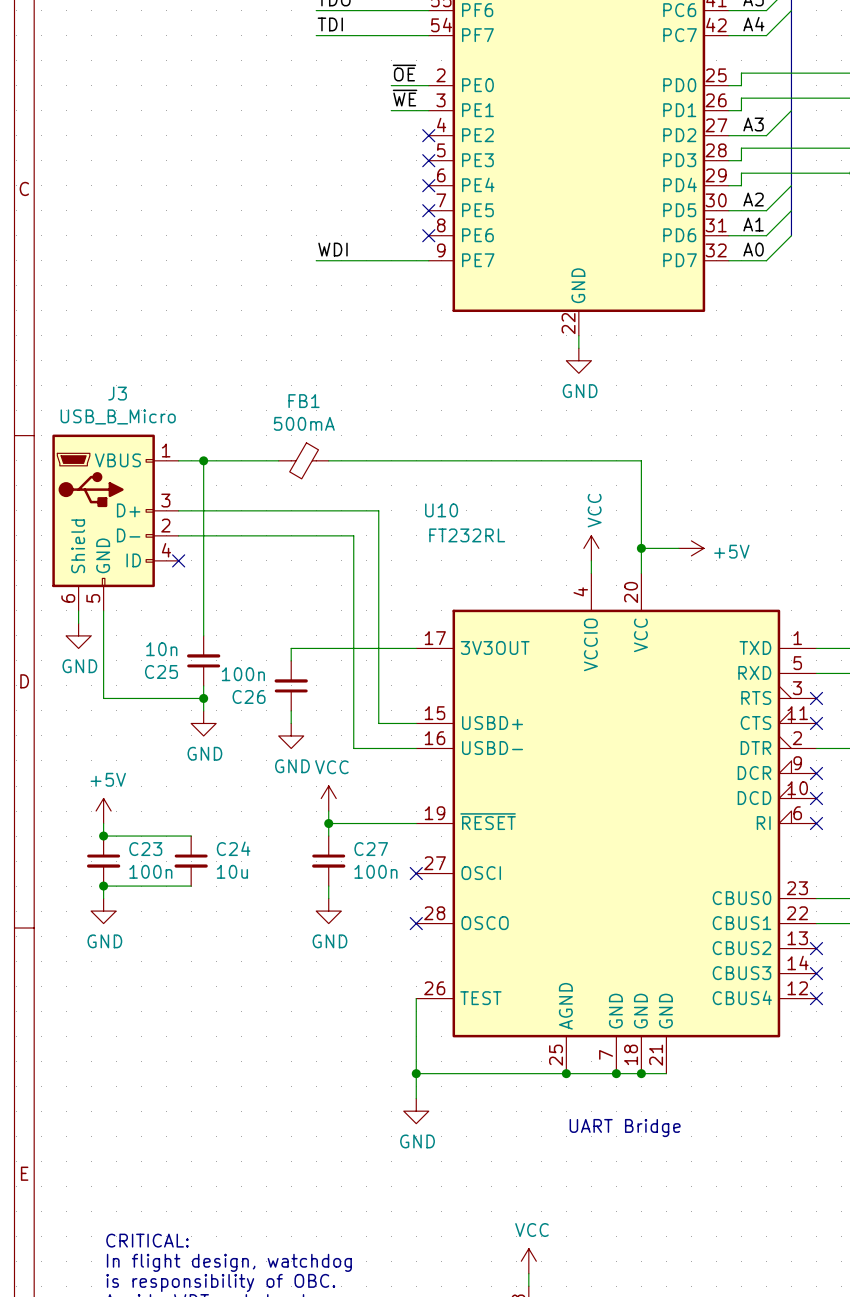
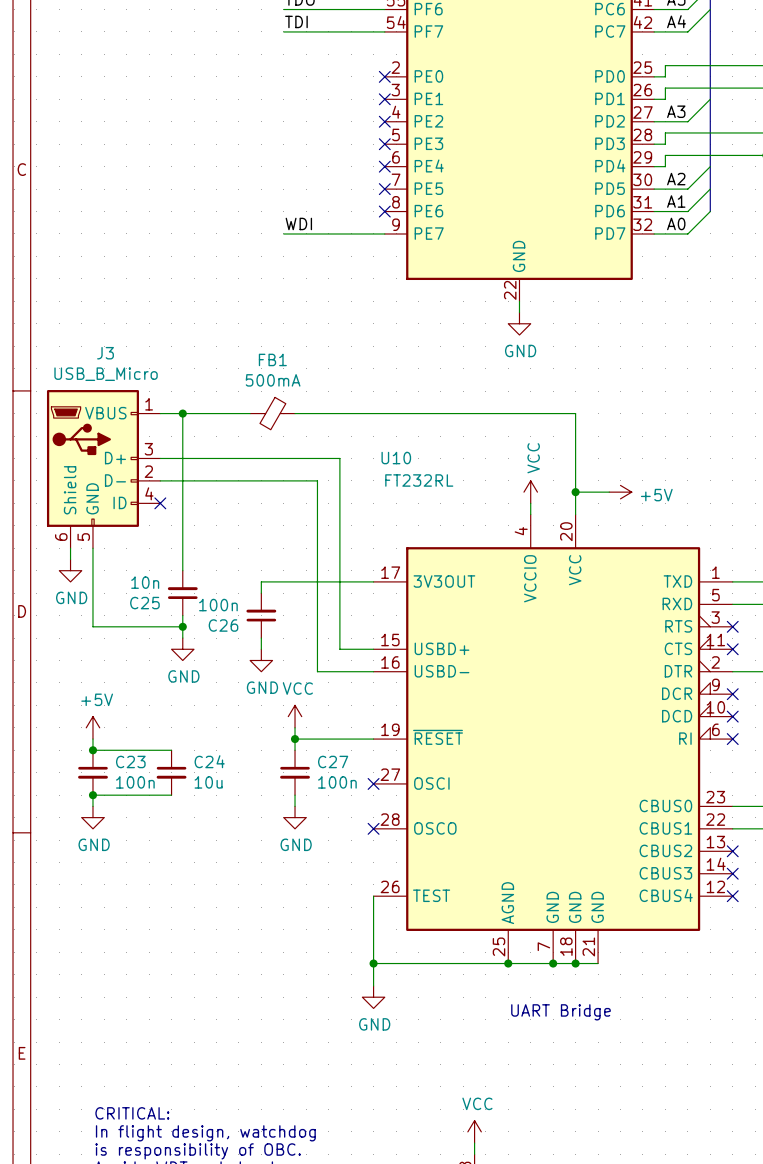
label: ~{OE} (404, 73) -> none
wire: (391, 85) (428, 85) -> none
no-connect mark: none -> (384, 76)
label: ~{WE} (405, 98) -> none
wire: (391, 110) (428, 110) -> none
no-connect mark: none -> (384, 99)

